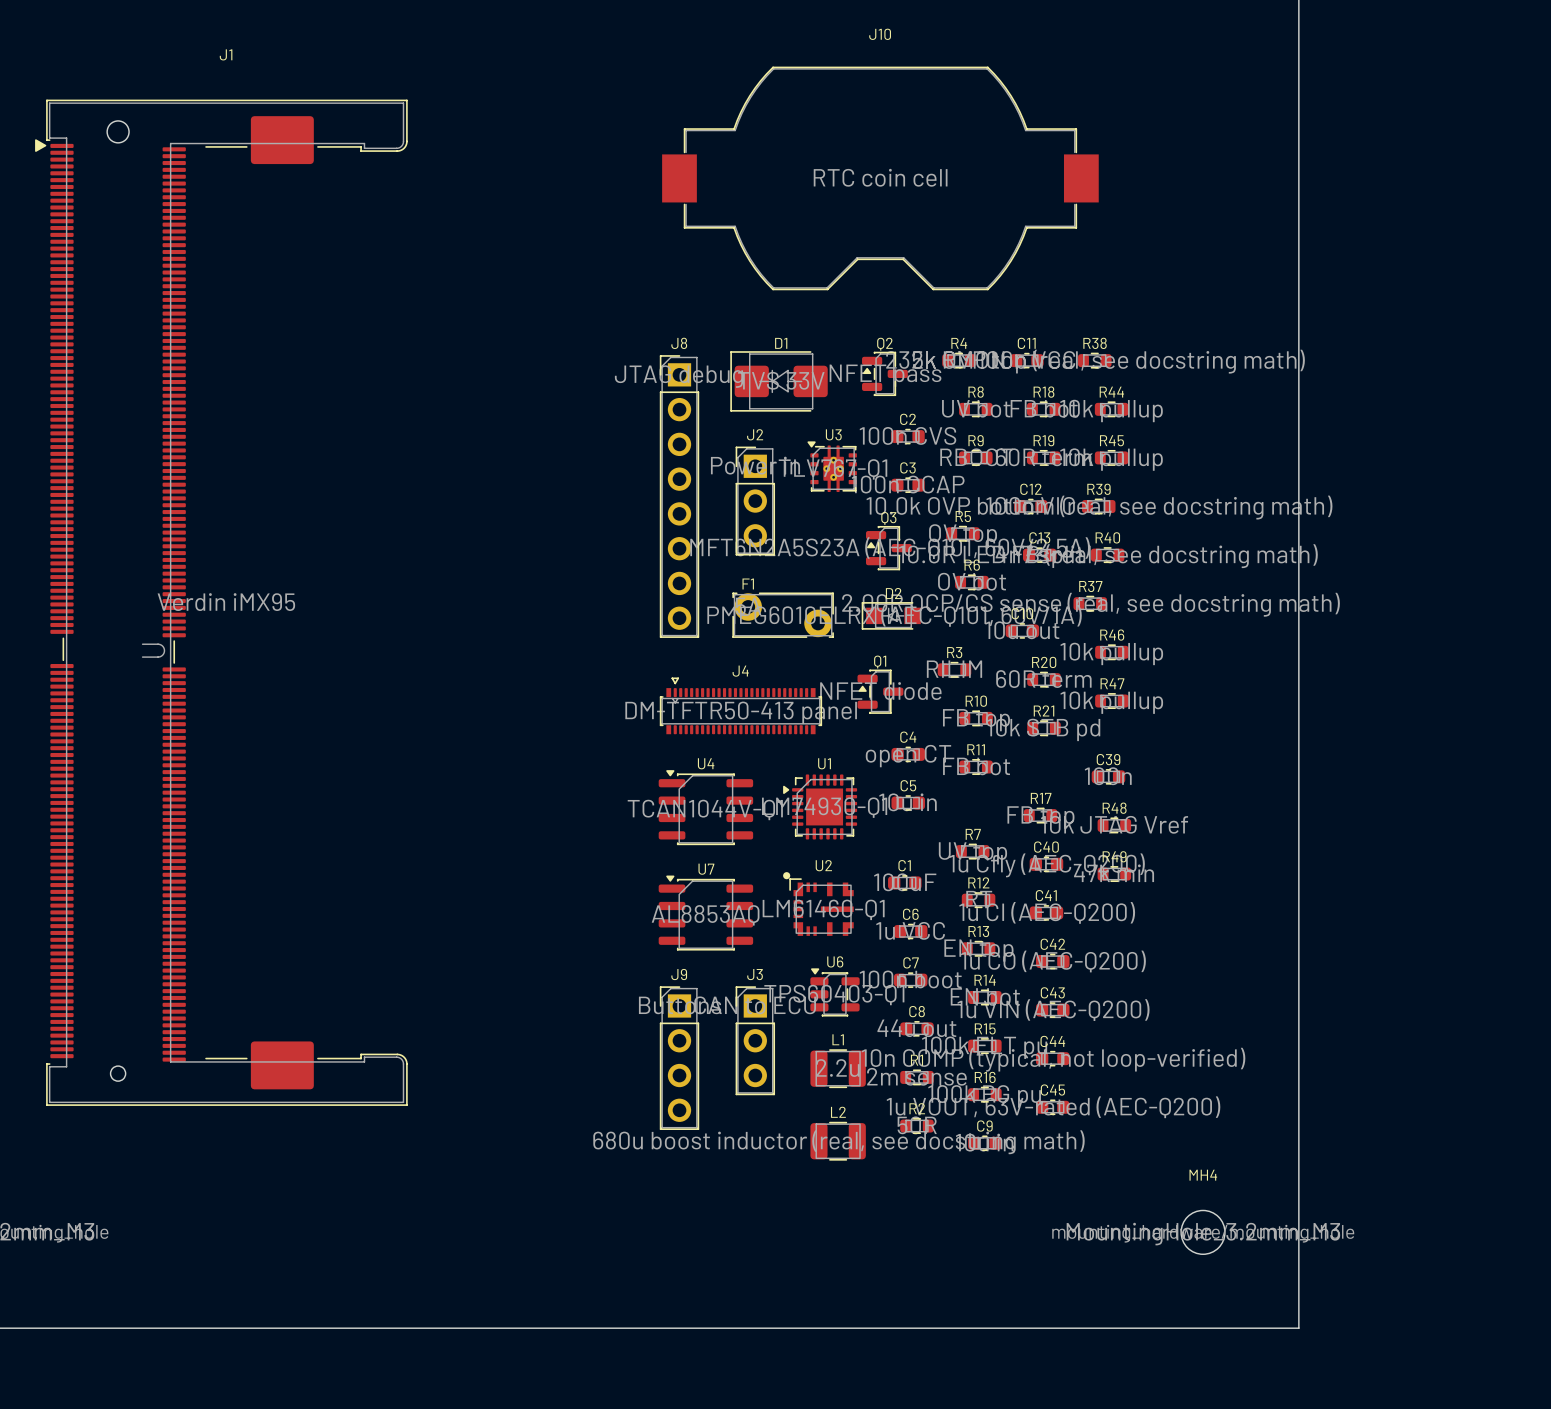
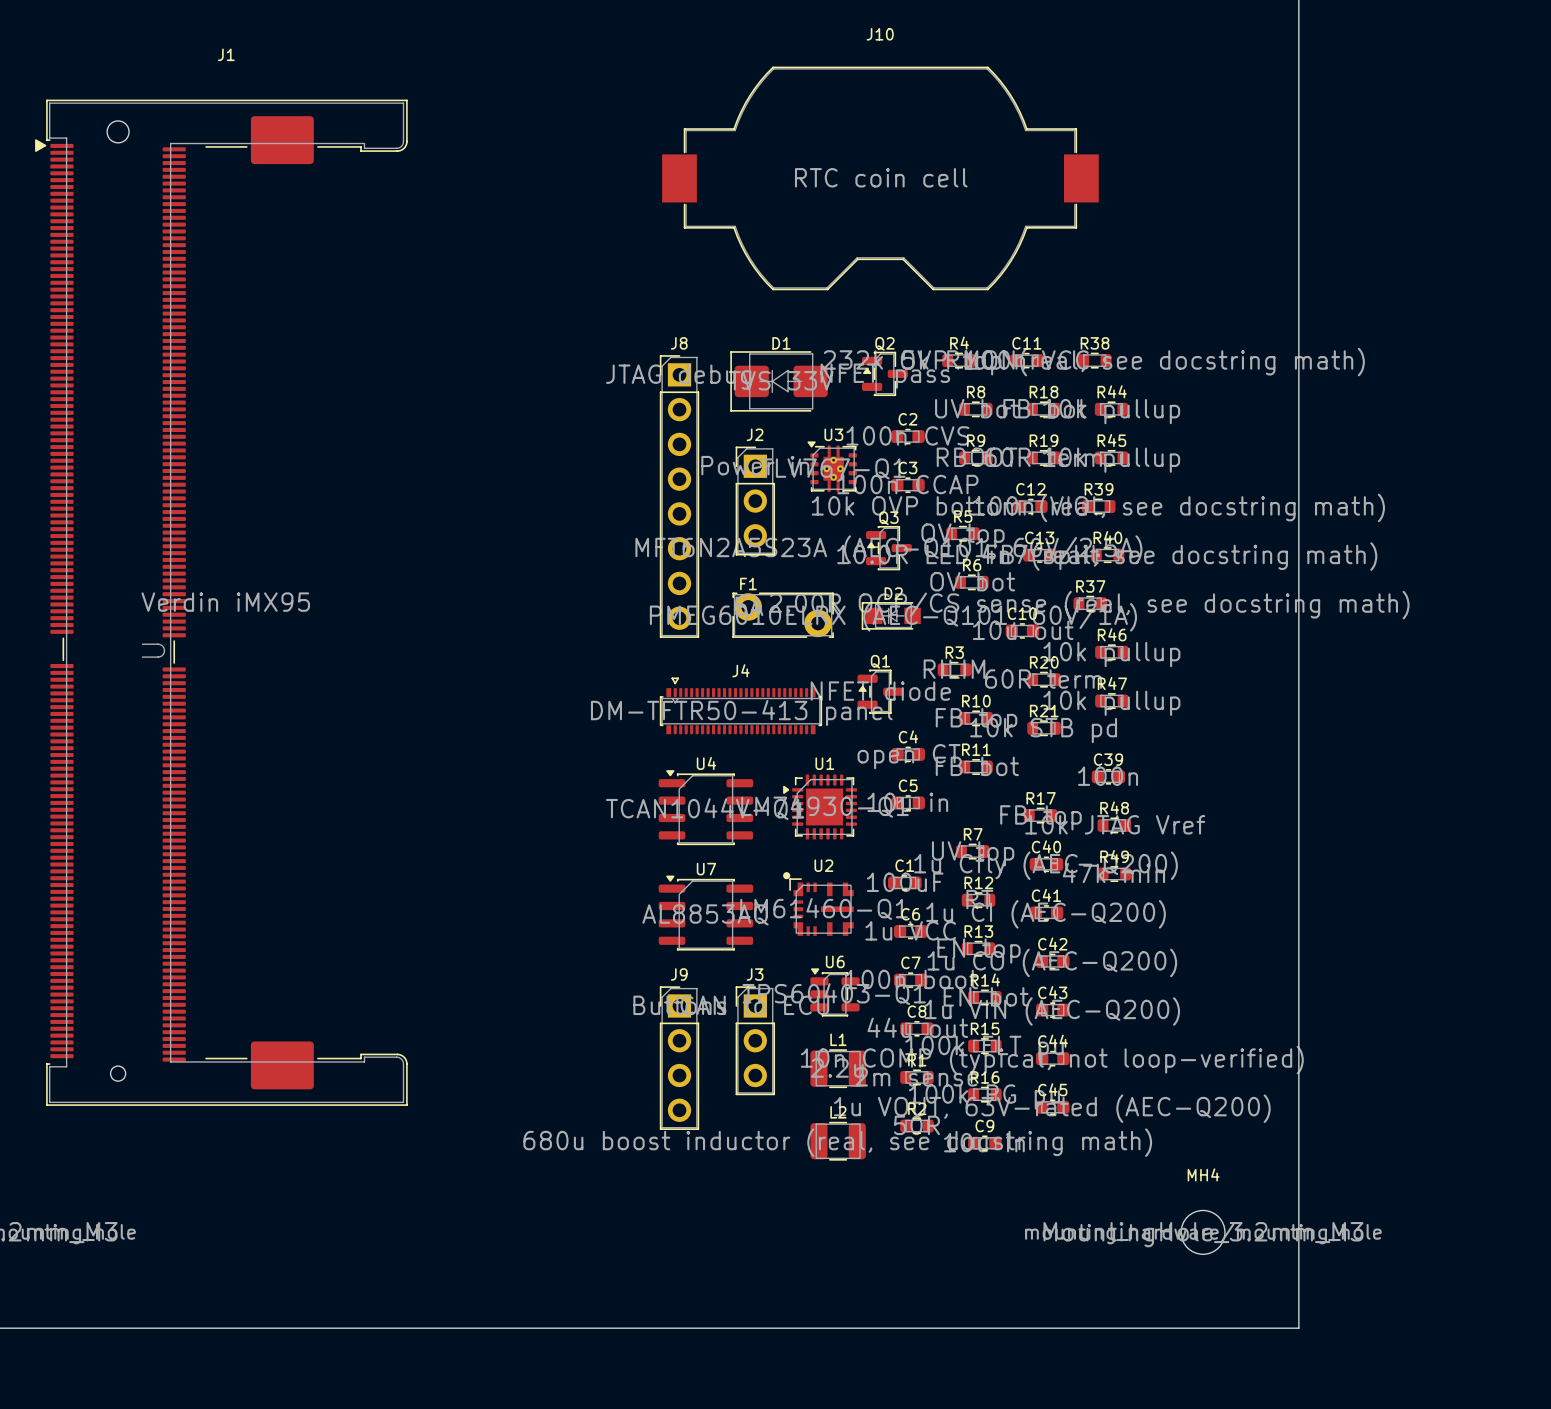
R39 value: 10.0k OVP bottom (real, see docstring math) (1099, 507) -> 10k OVP bottom (real, see docstring math) (1098, 507)

